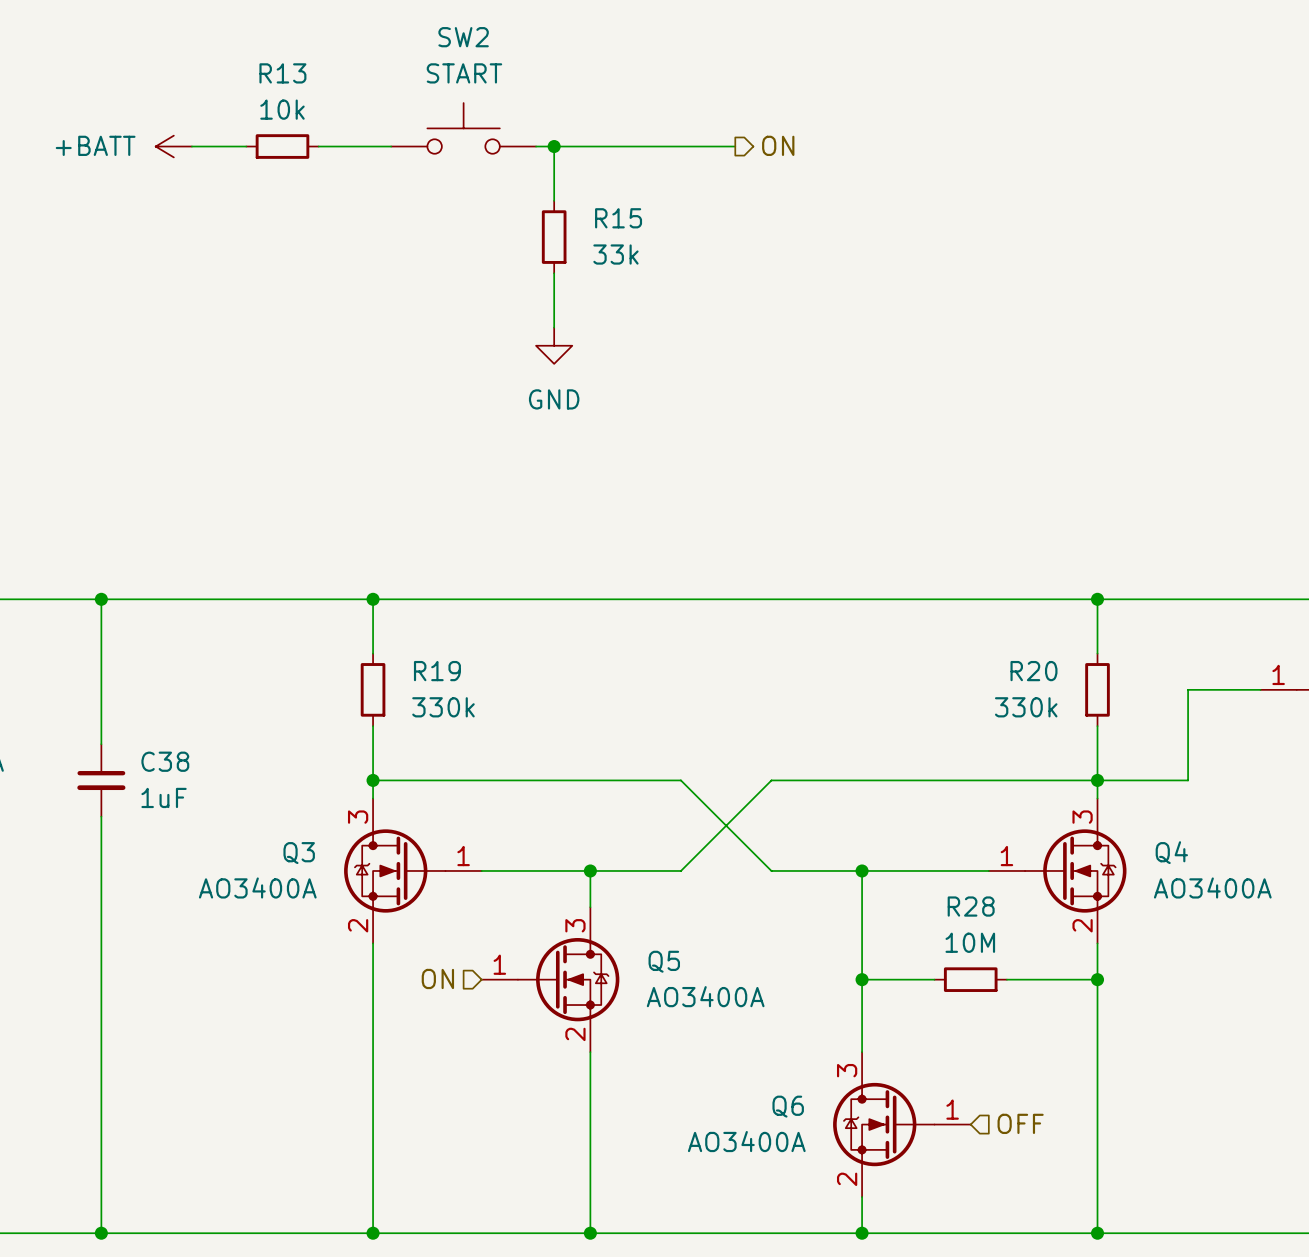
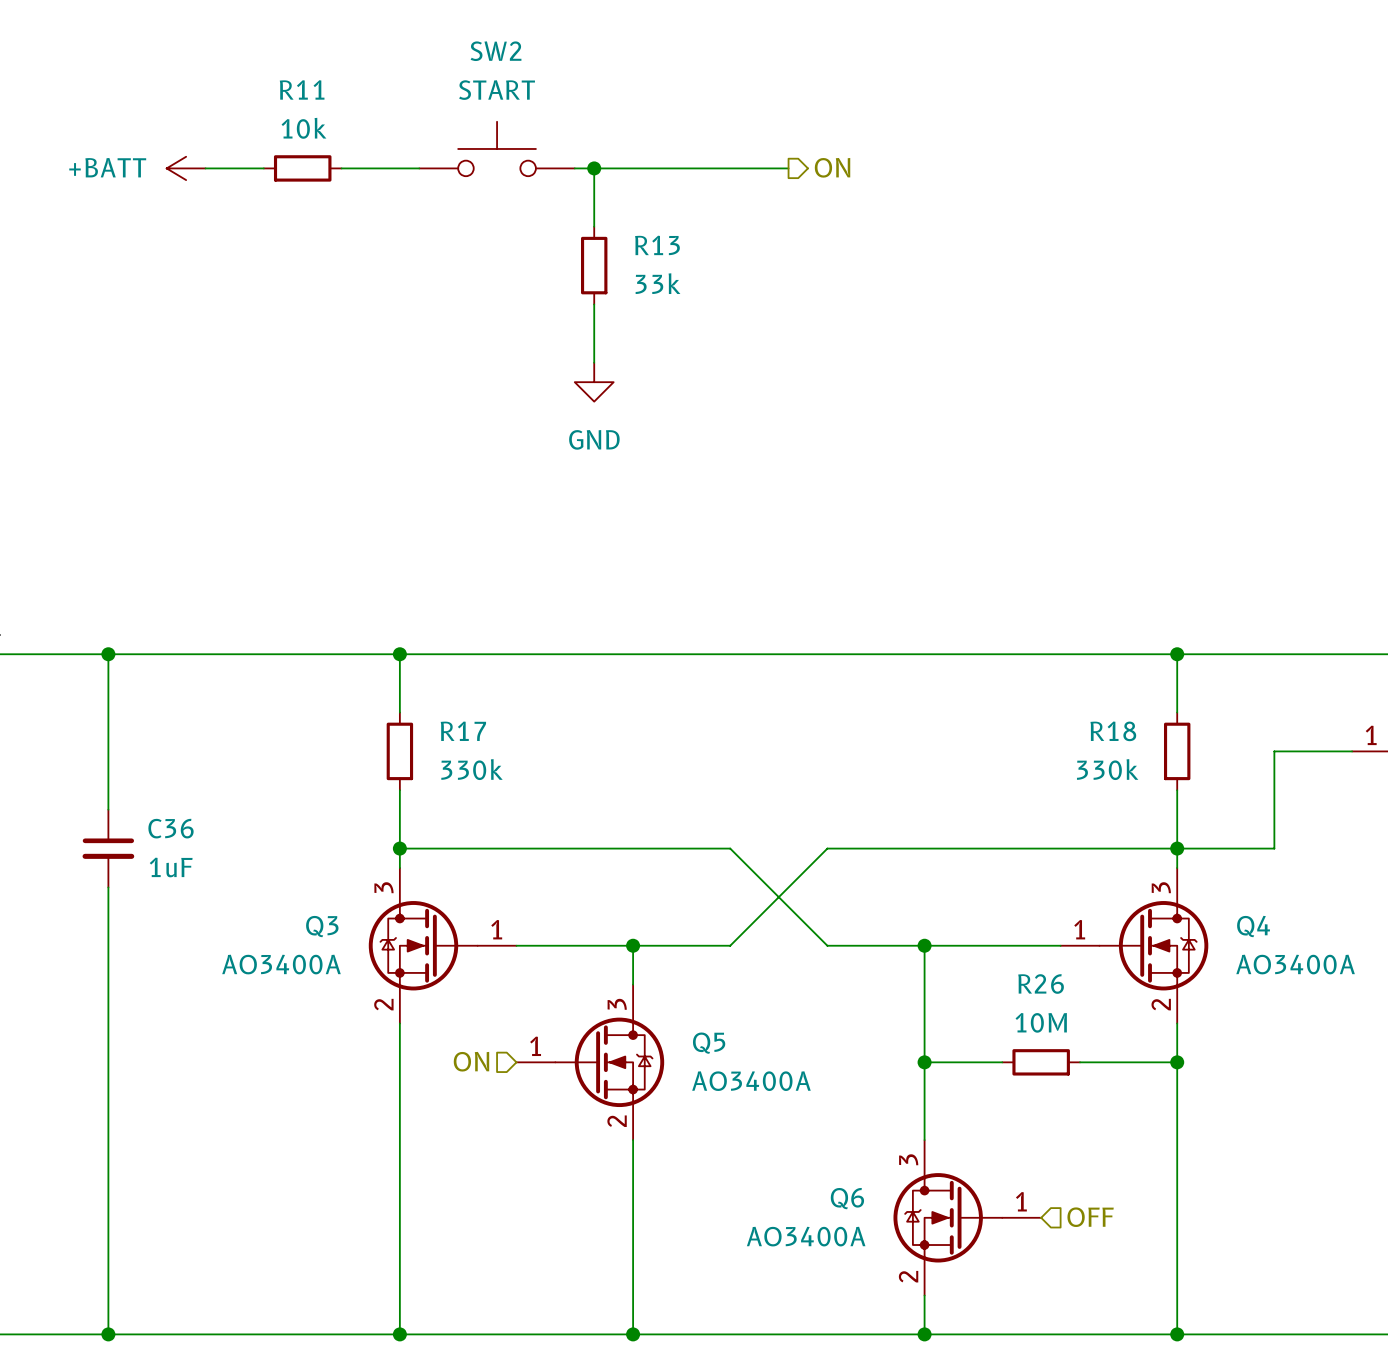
R13 name: R13 (282, 73) -> R11 (302, 89)
R15 name: R15 (618, 218) -> R13 (657, 245)
R19 name: R19 (437, 671) -> R17 (463, 731)
R20 name: R20 (1033, 671) -> R18 (1113, 731)
C38 name: C38 (165, 761) -> C36 (171, 828)
R28 name: R28 (971, 906) -> R26 (1041, 984)

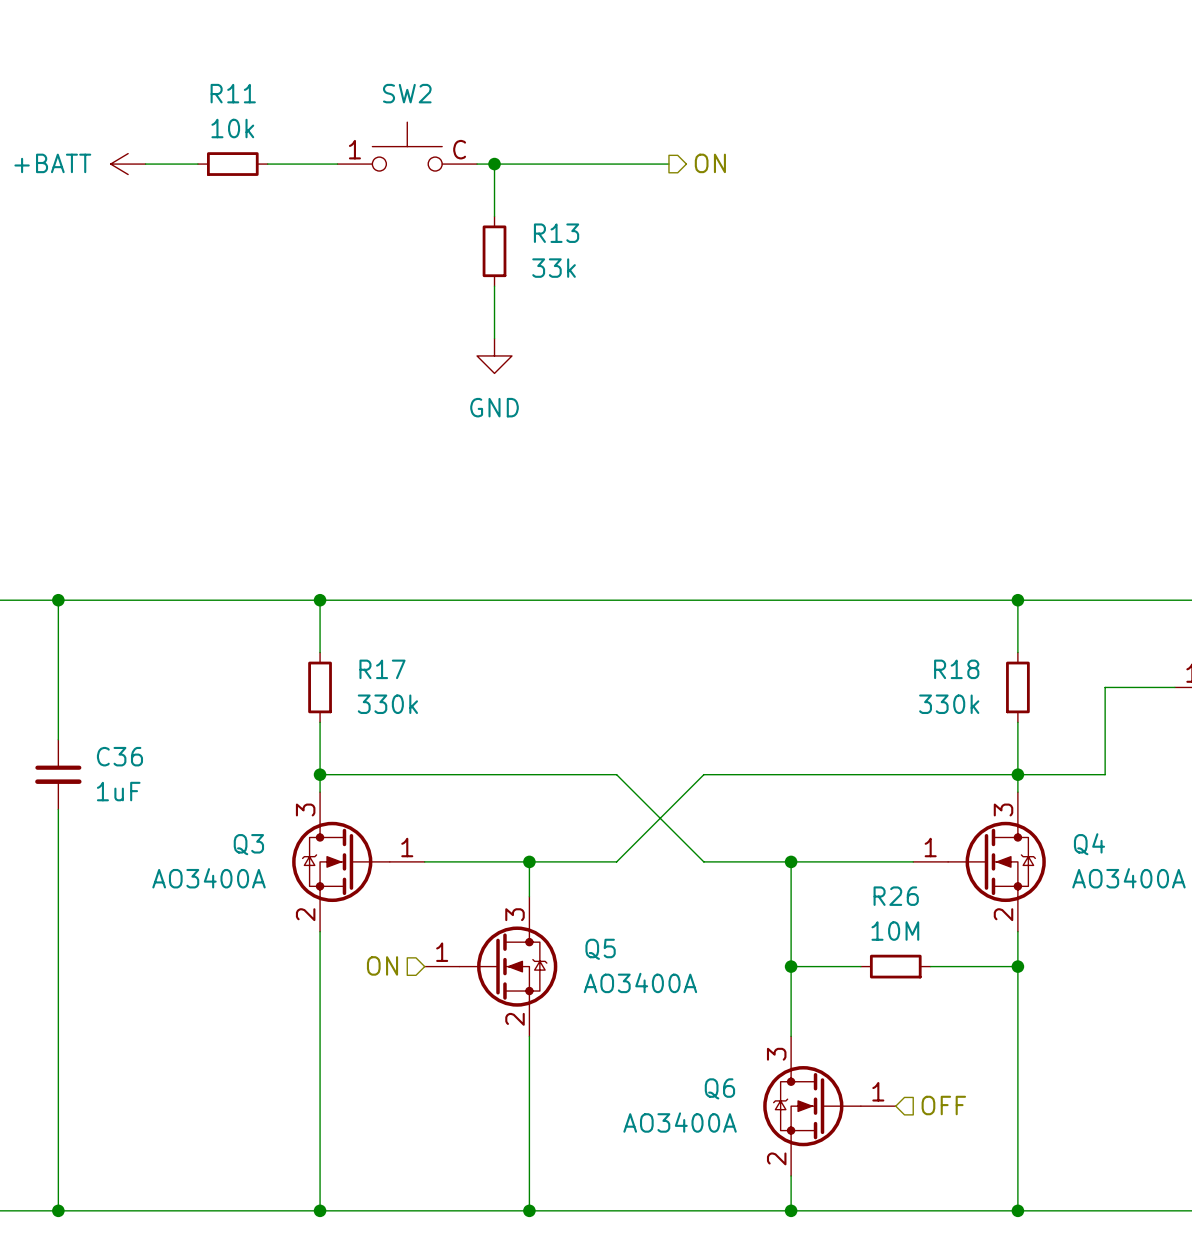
SW2 name position: SW2 (496, 51) -> SW2 (407, 93)
SW2 value: START (497, 90) -> none
SW2 pin number: none -> 1 (354, 149)
SW2 pin number: none -> C (459, 149)

